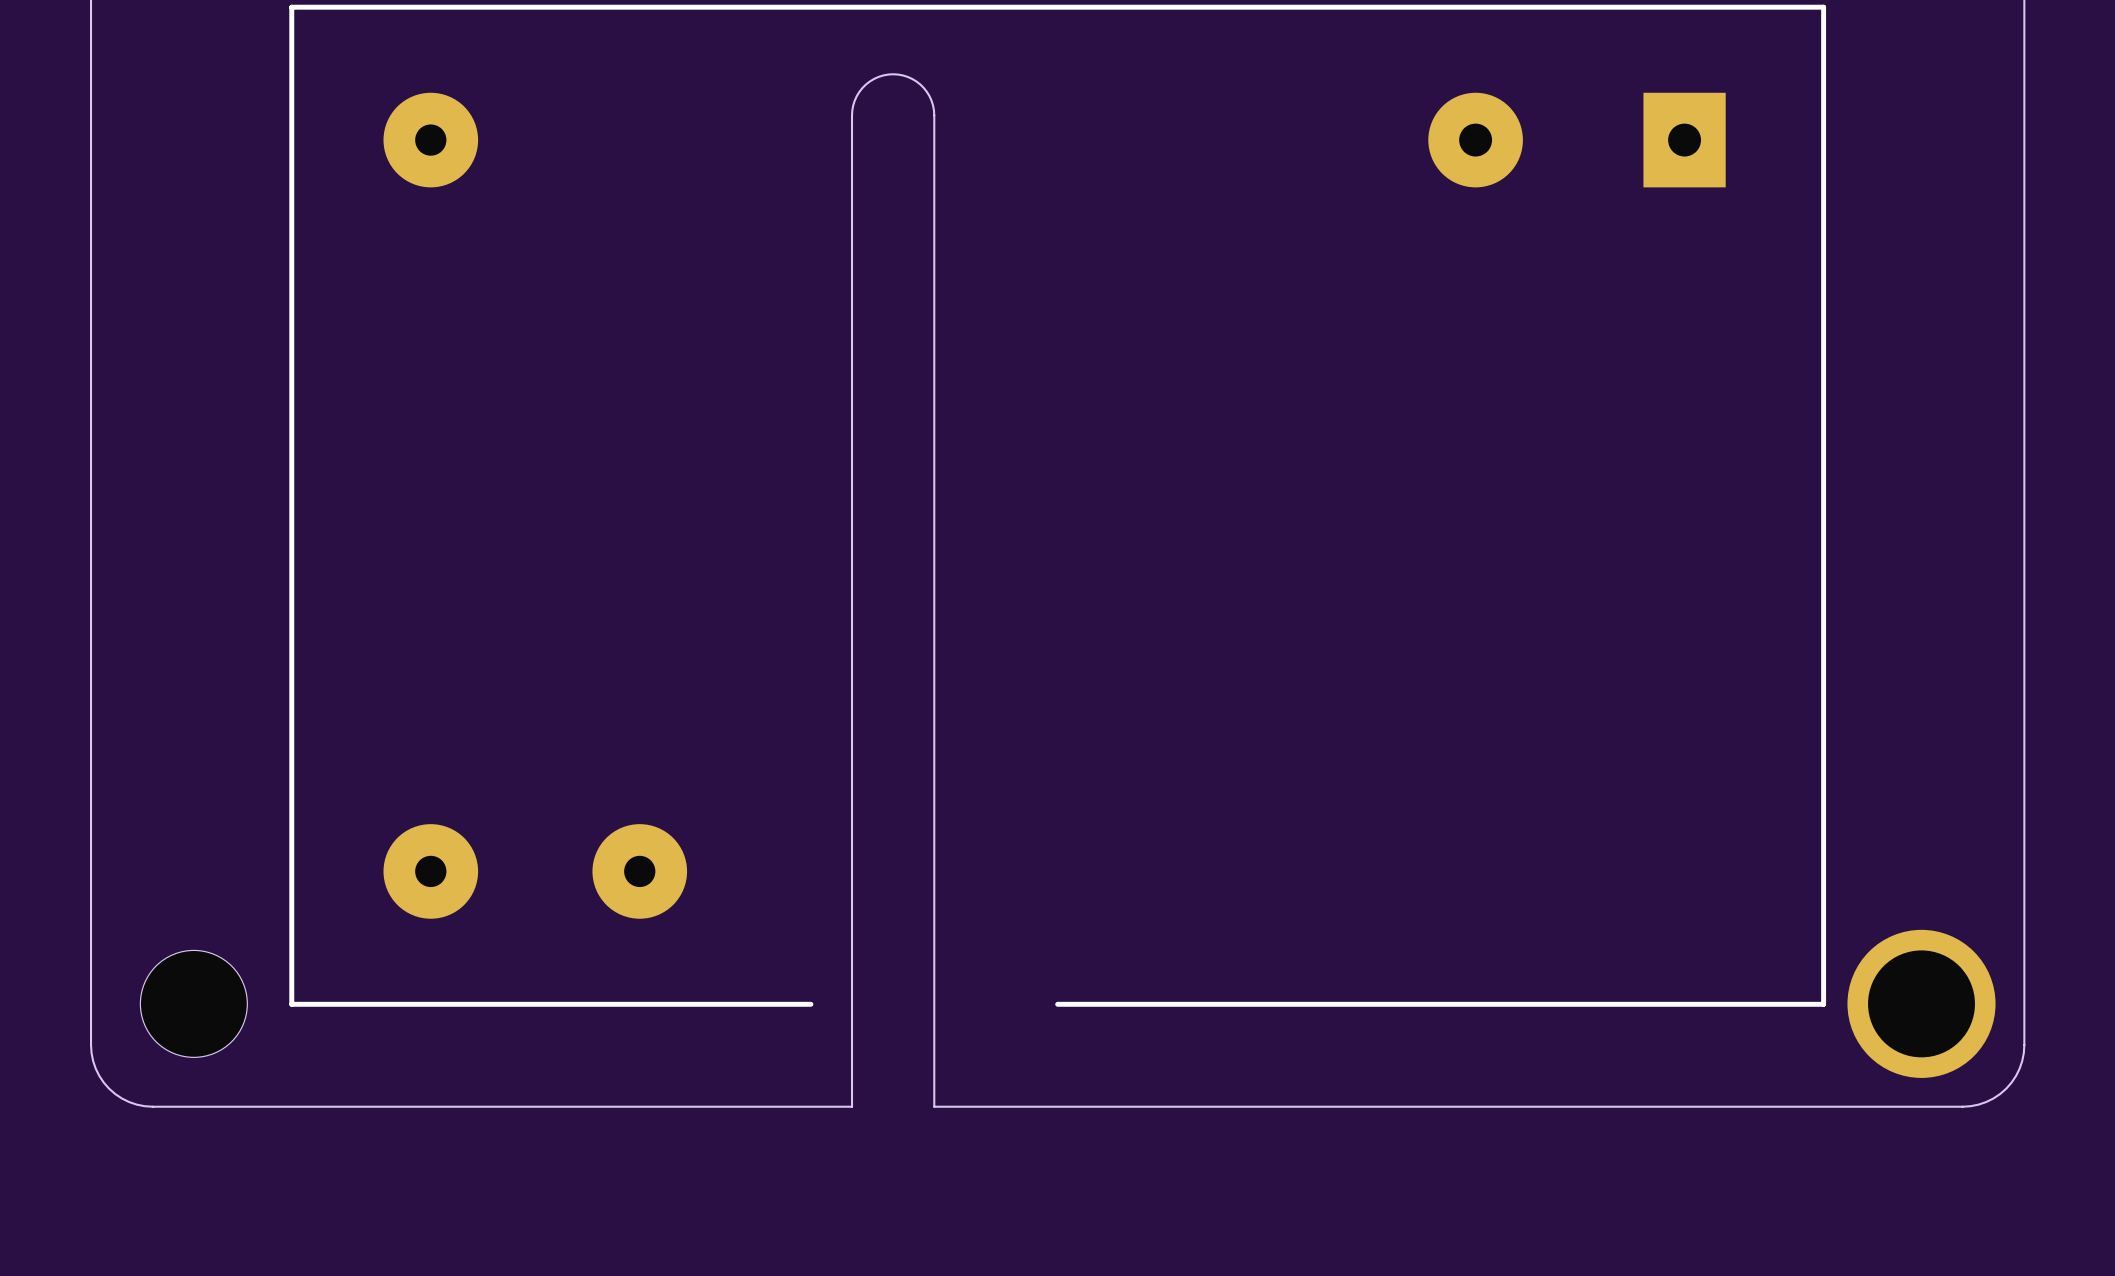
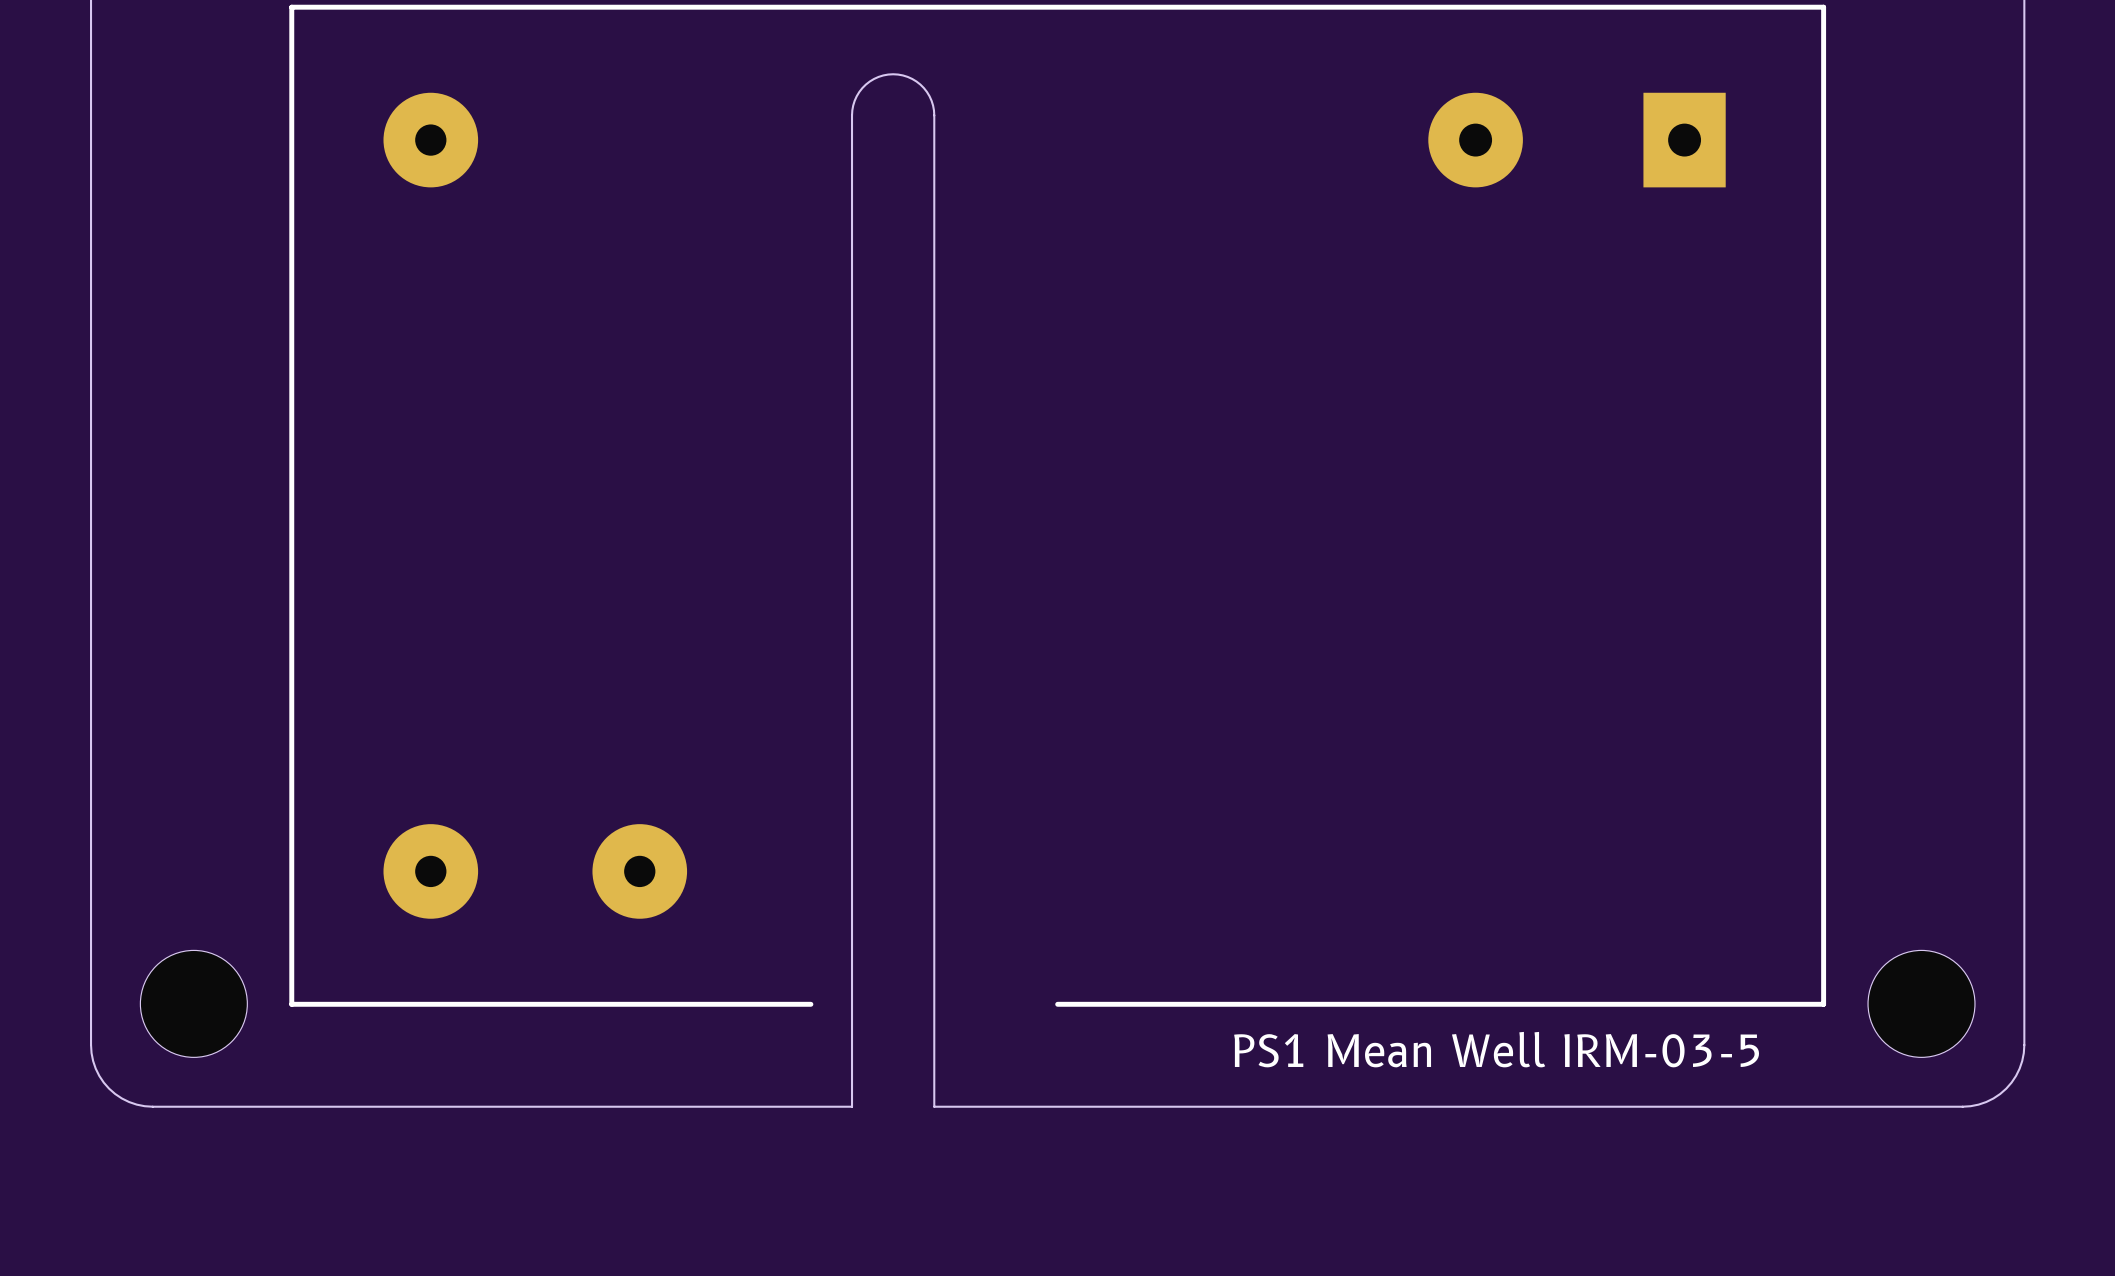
part footprint: [1847, 929, 1996, 1078] -> [1868, 950, 1975, 1058]
text: none -> PS1 Mean Well IRM-03-5 (1496, 1049)

